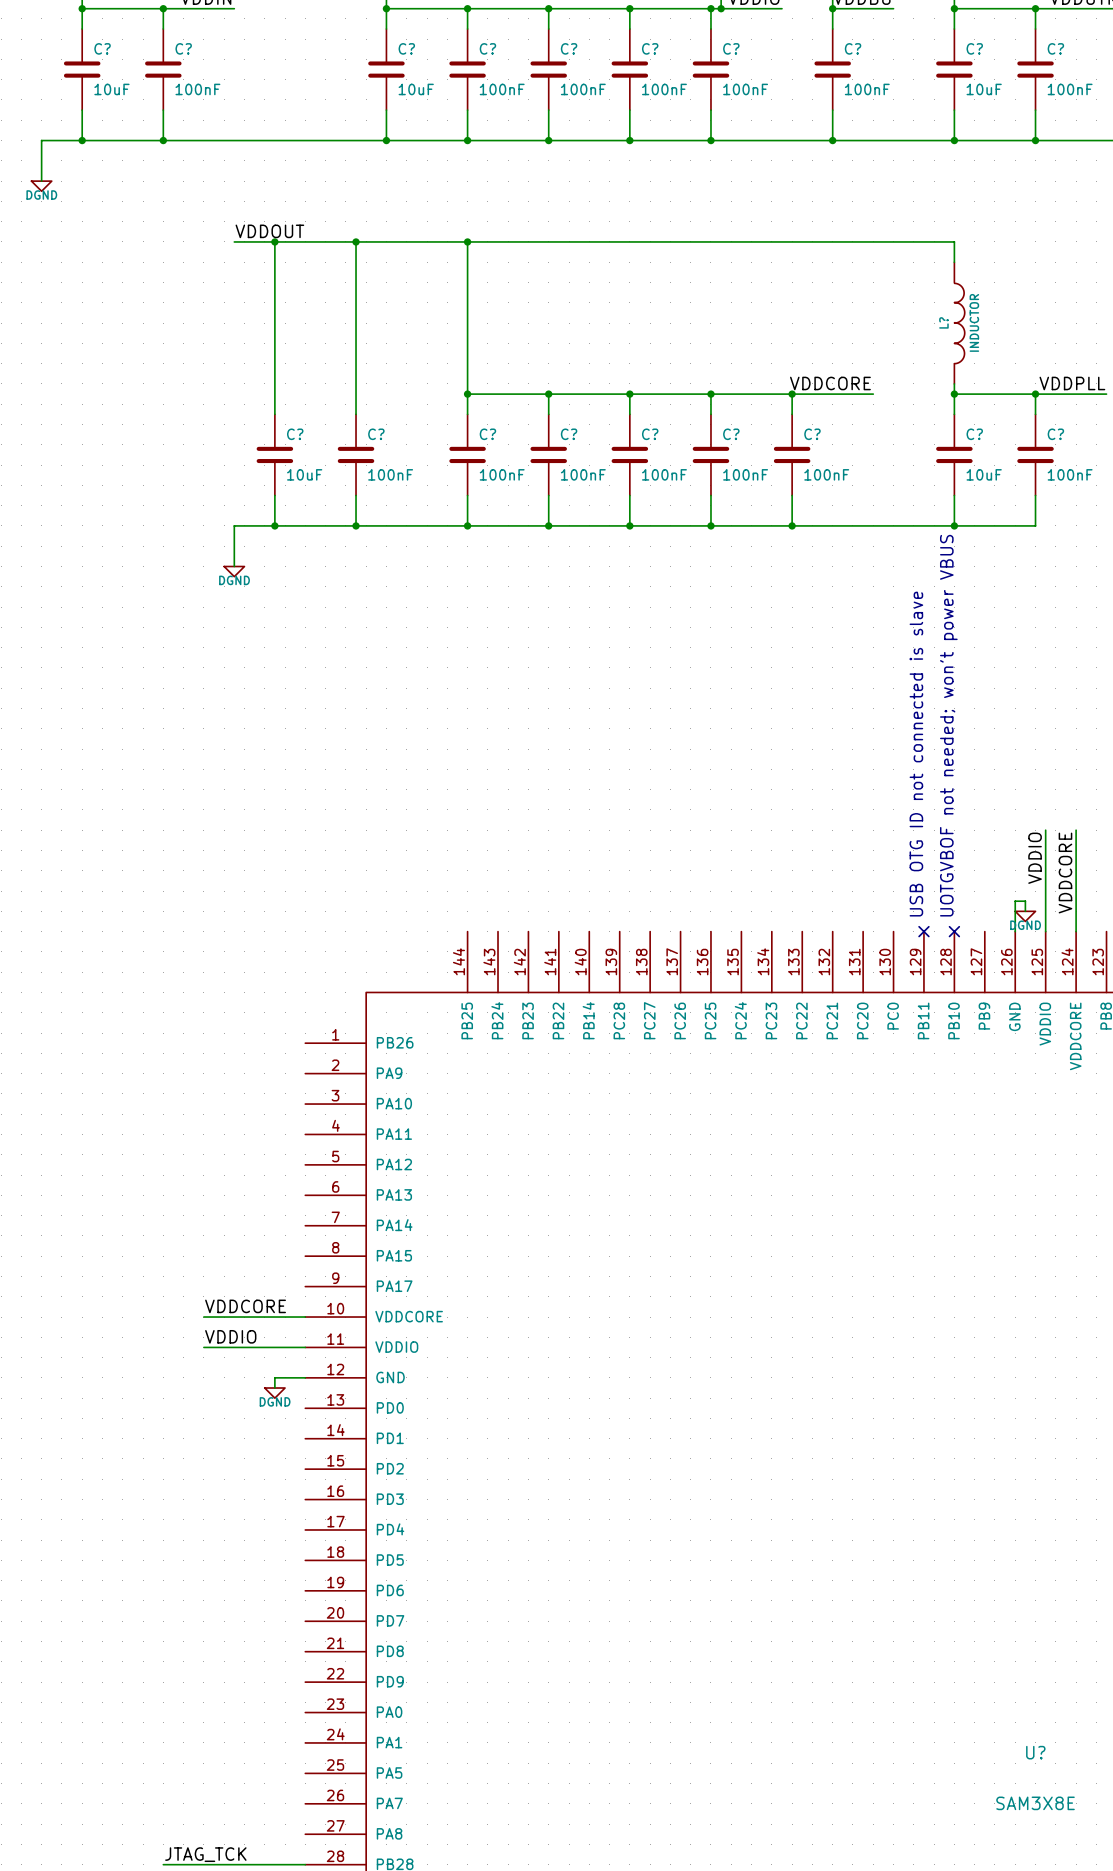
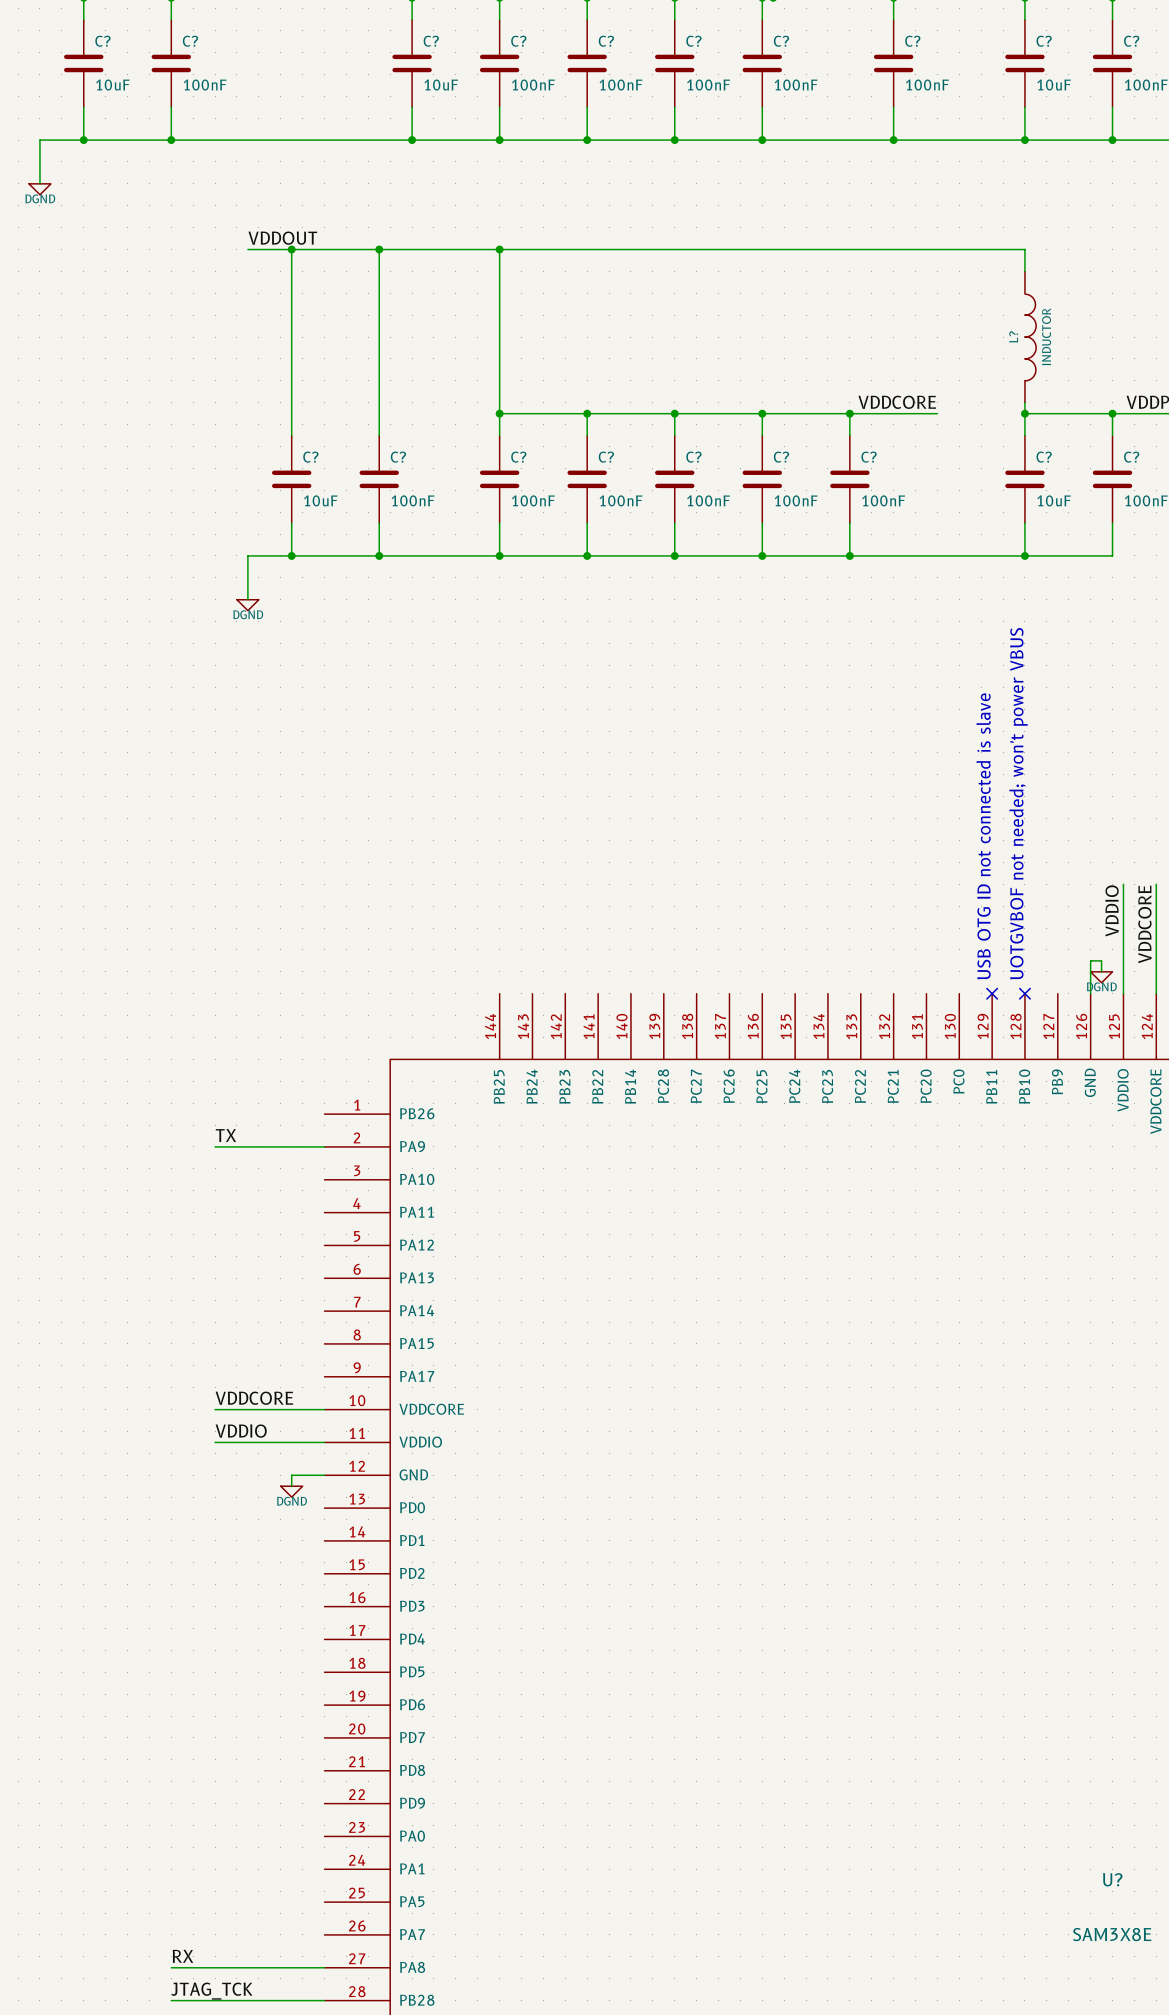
label: none -> TX (225, 1135)
wire: none -> (215, 1146) (324, 1146)
label: none -> RX (182, 1956)
wire: none -> (171, 1967) (324, 1967)

